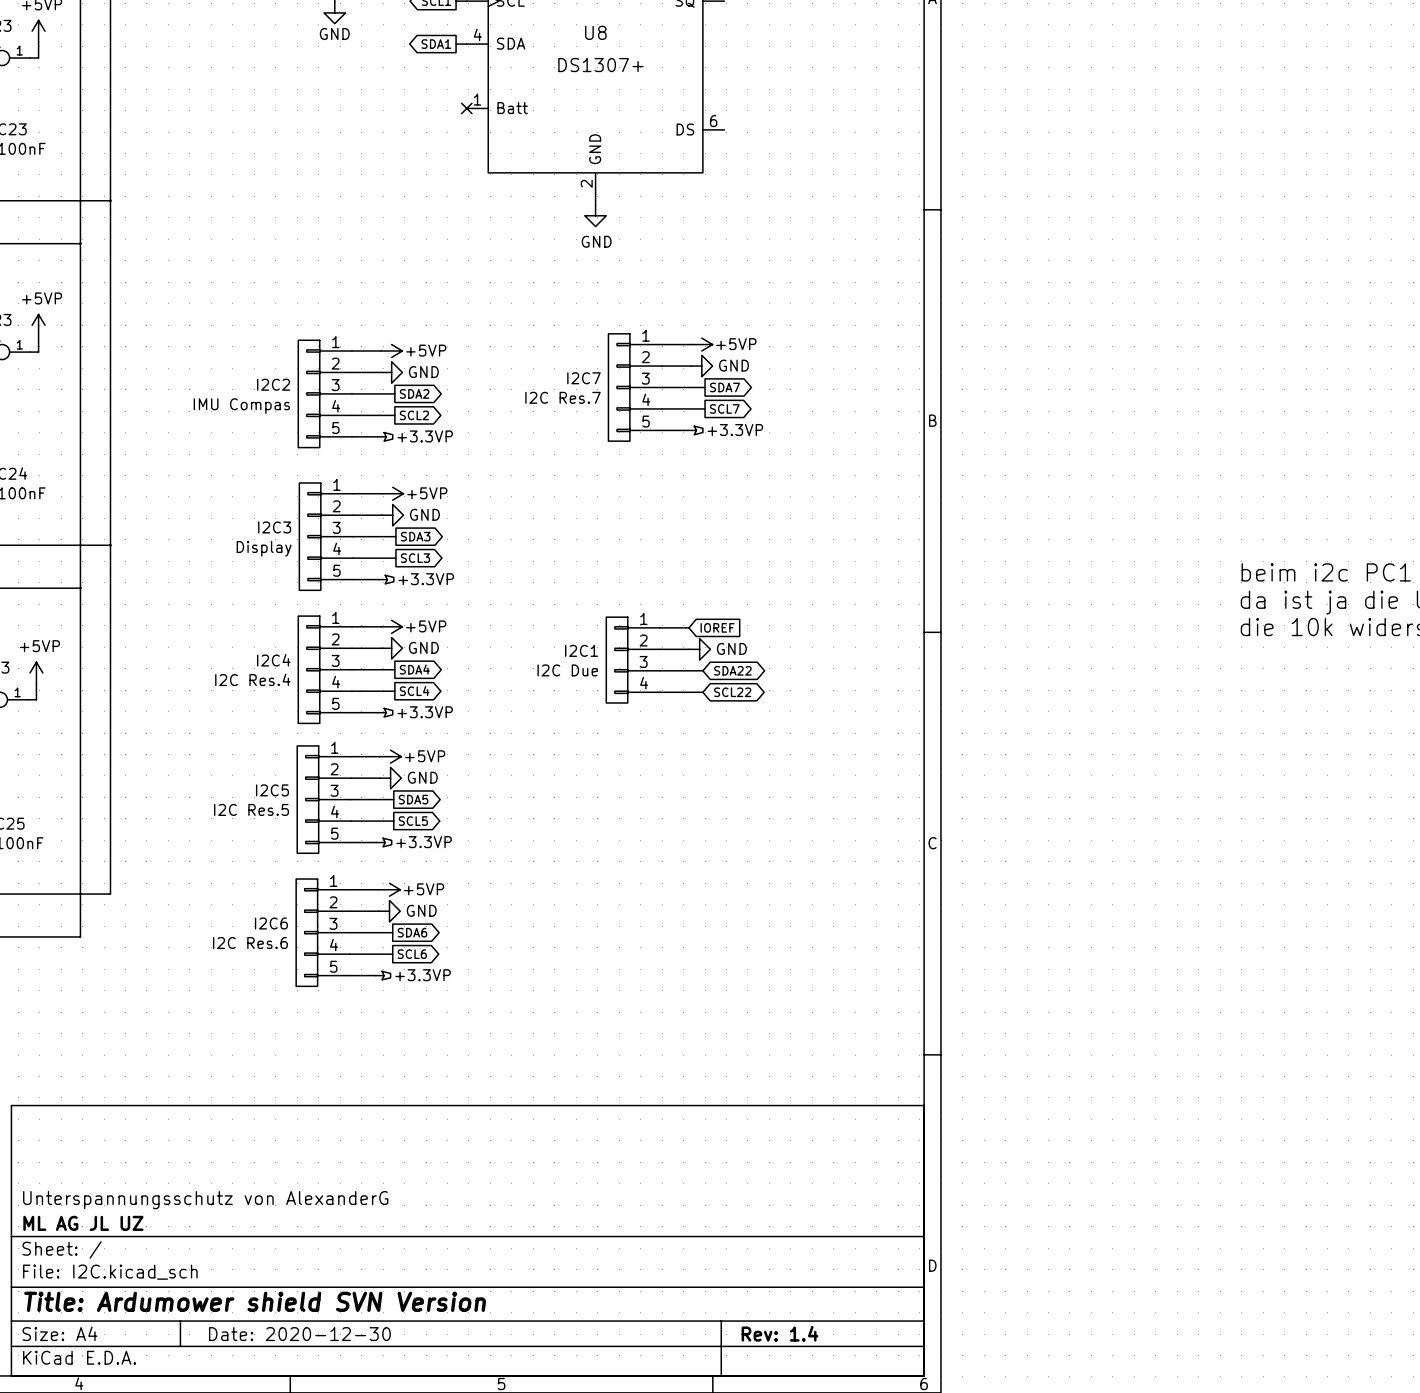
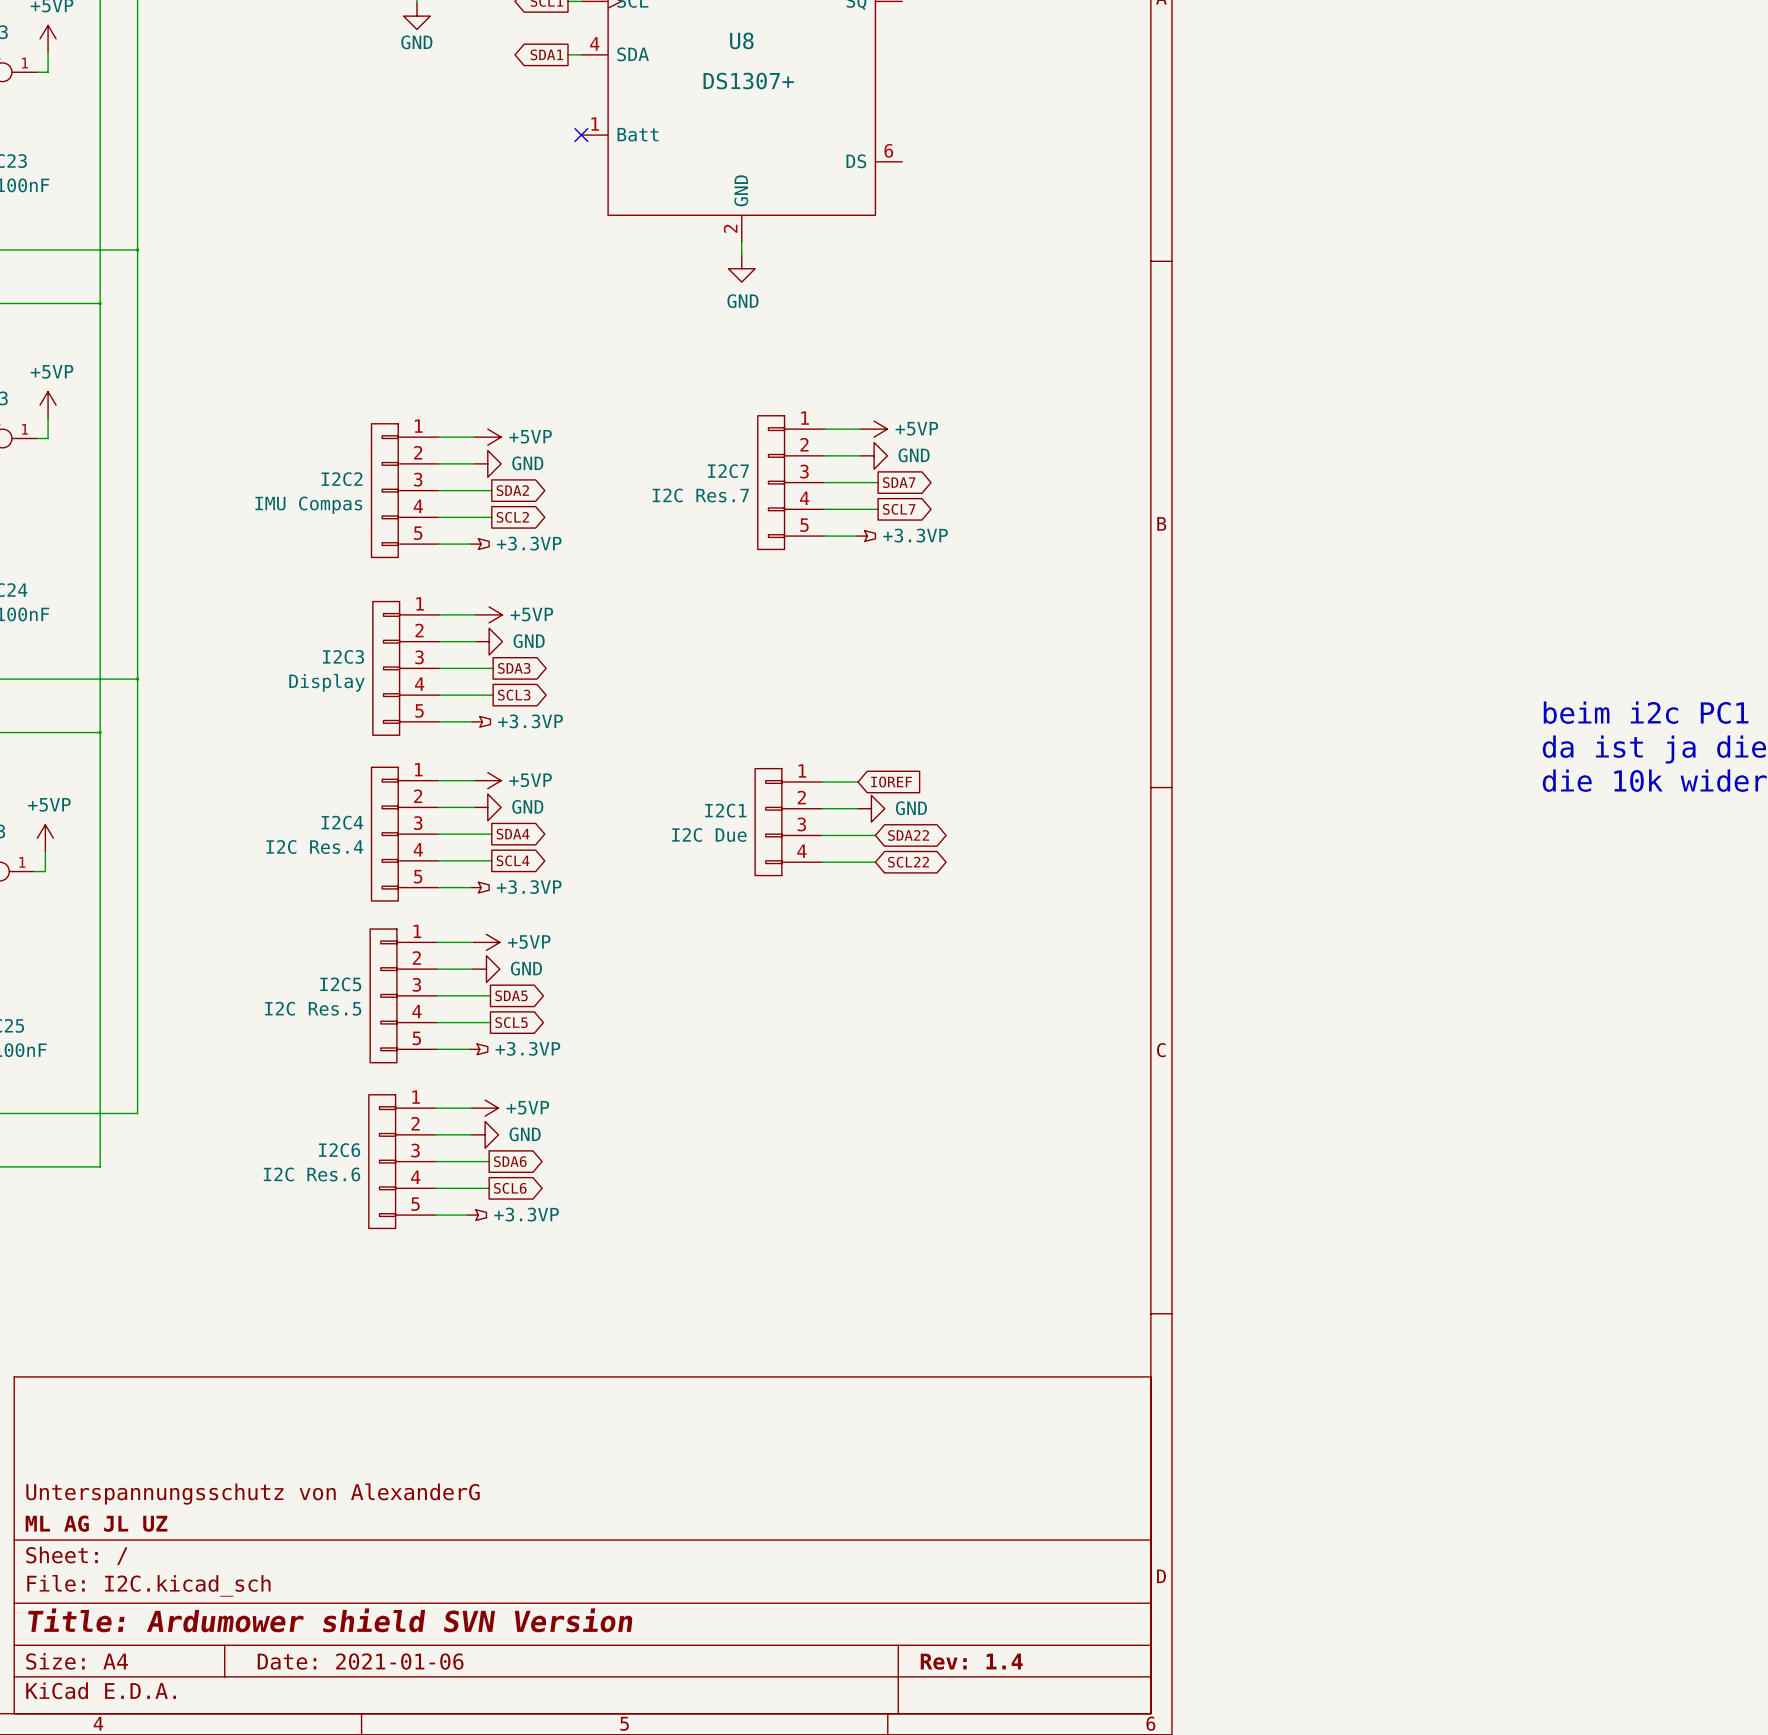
title block: Date: 2020-12-30 (299, 1334) -> Date: 2021-01-06 (360, 1661)

